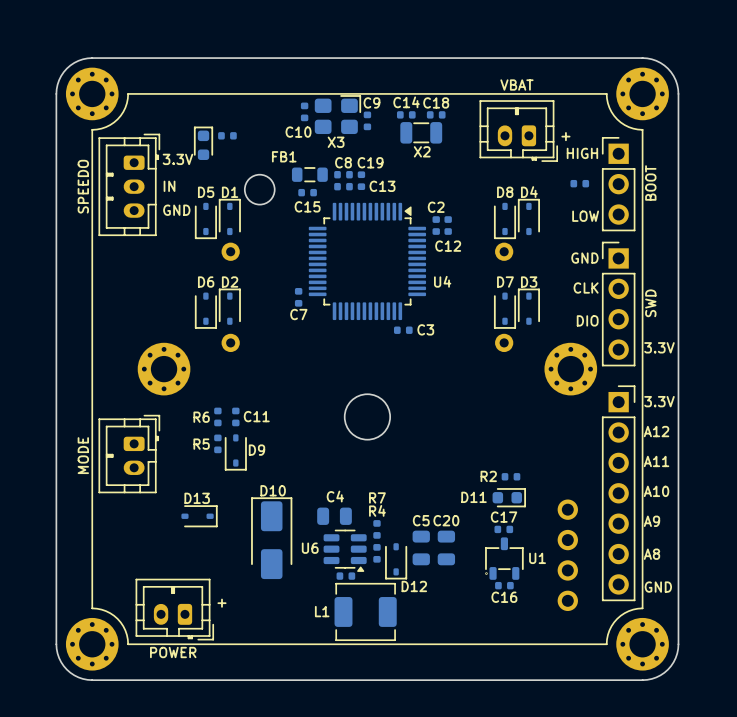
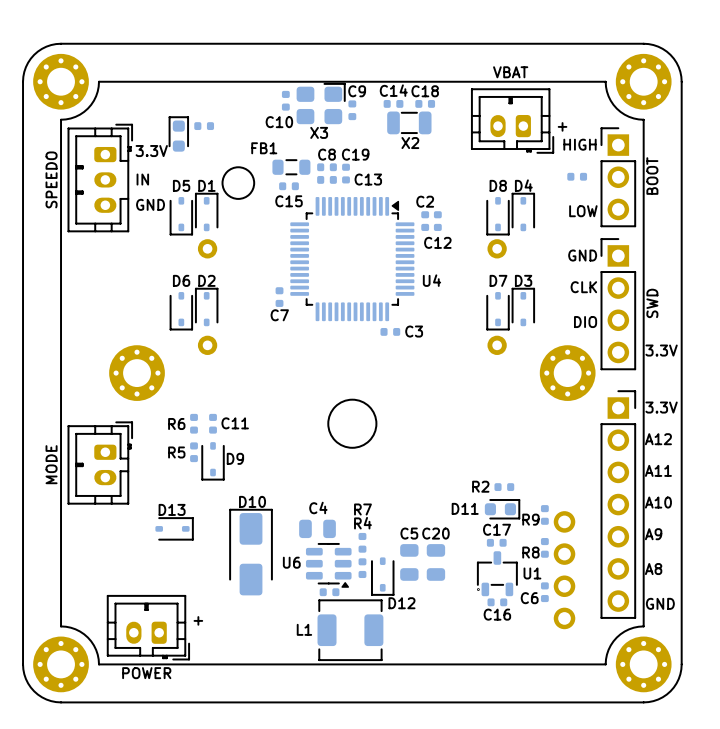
R9: none -> (544, 514)
R8: none -> (544, 547)
C6: none -> (544, 592)

